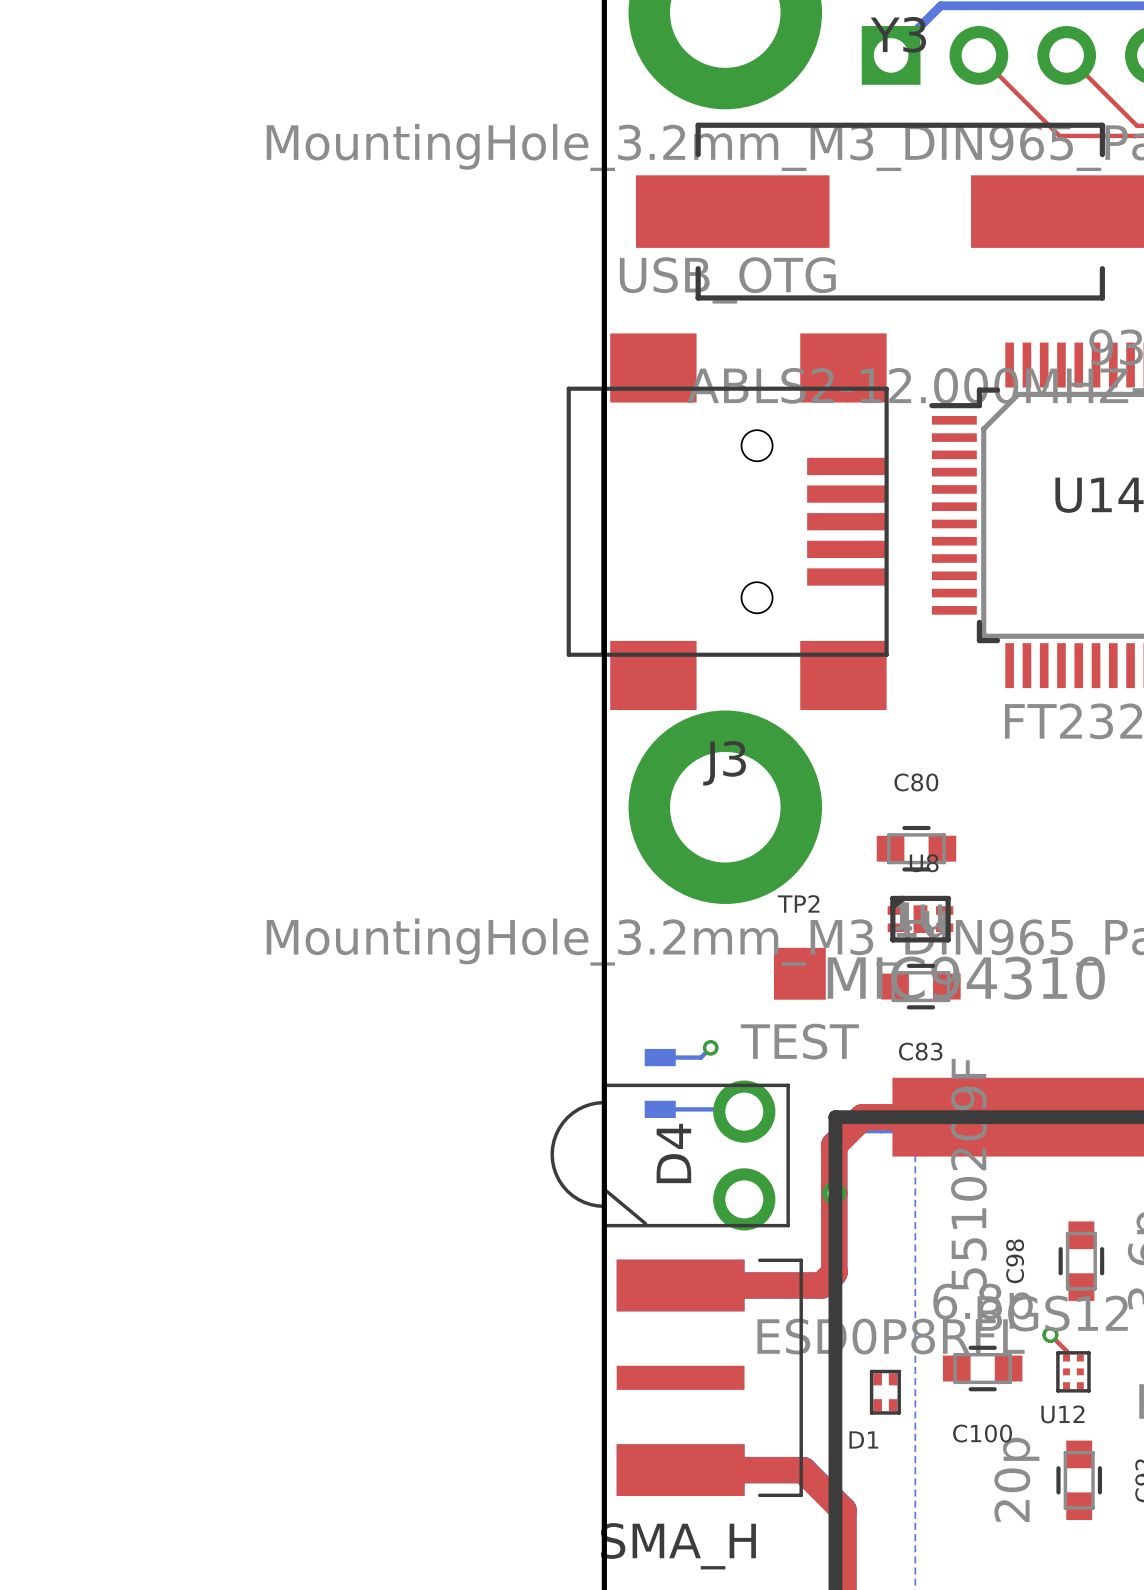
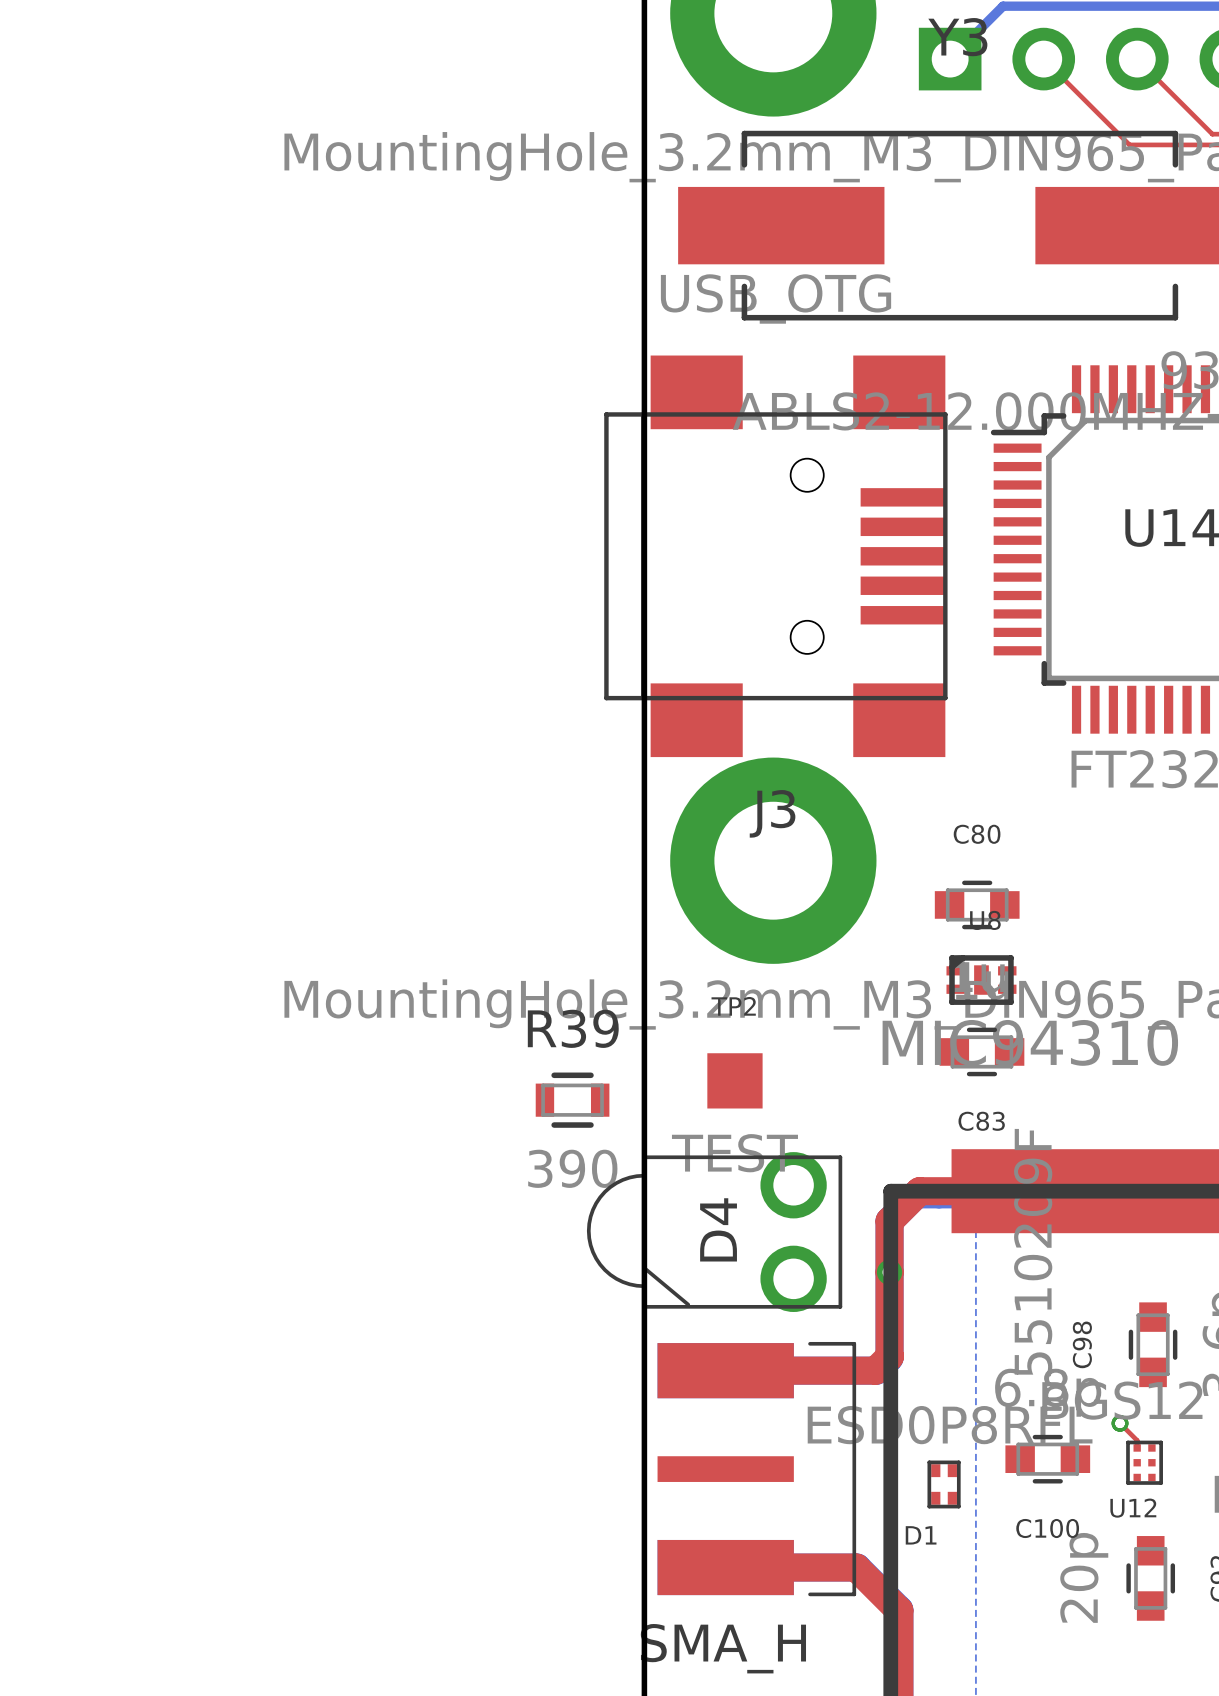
TP2 position: (799, 973) -> (734, 1080)
bottom track: (710, 1047) (701, 1057) (660, 1057) -> none
via: (710, 1047) -> none
R39 side: bottom (660, 1083) -> top (572, 1100)
bottom track: (660, 1109) (742, 1109) (744, 1111) -> none

